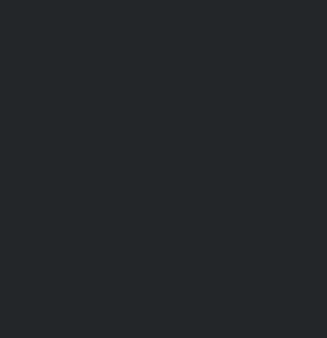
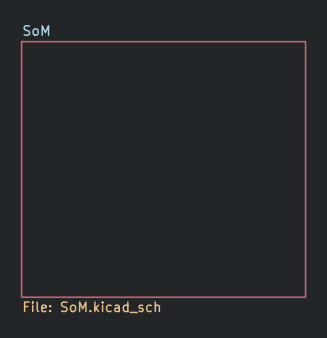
sheet SoM: none -> File: SoM.kicad_sch (163, 169)

